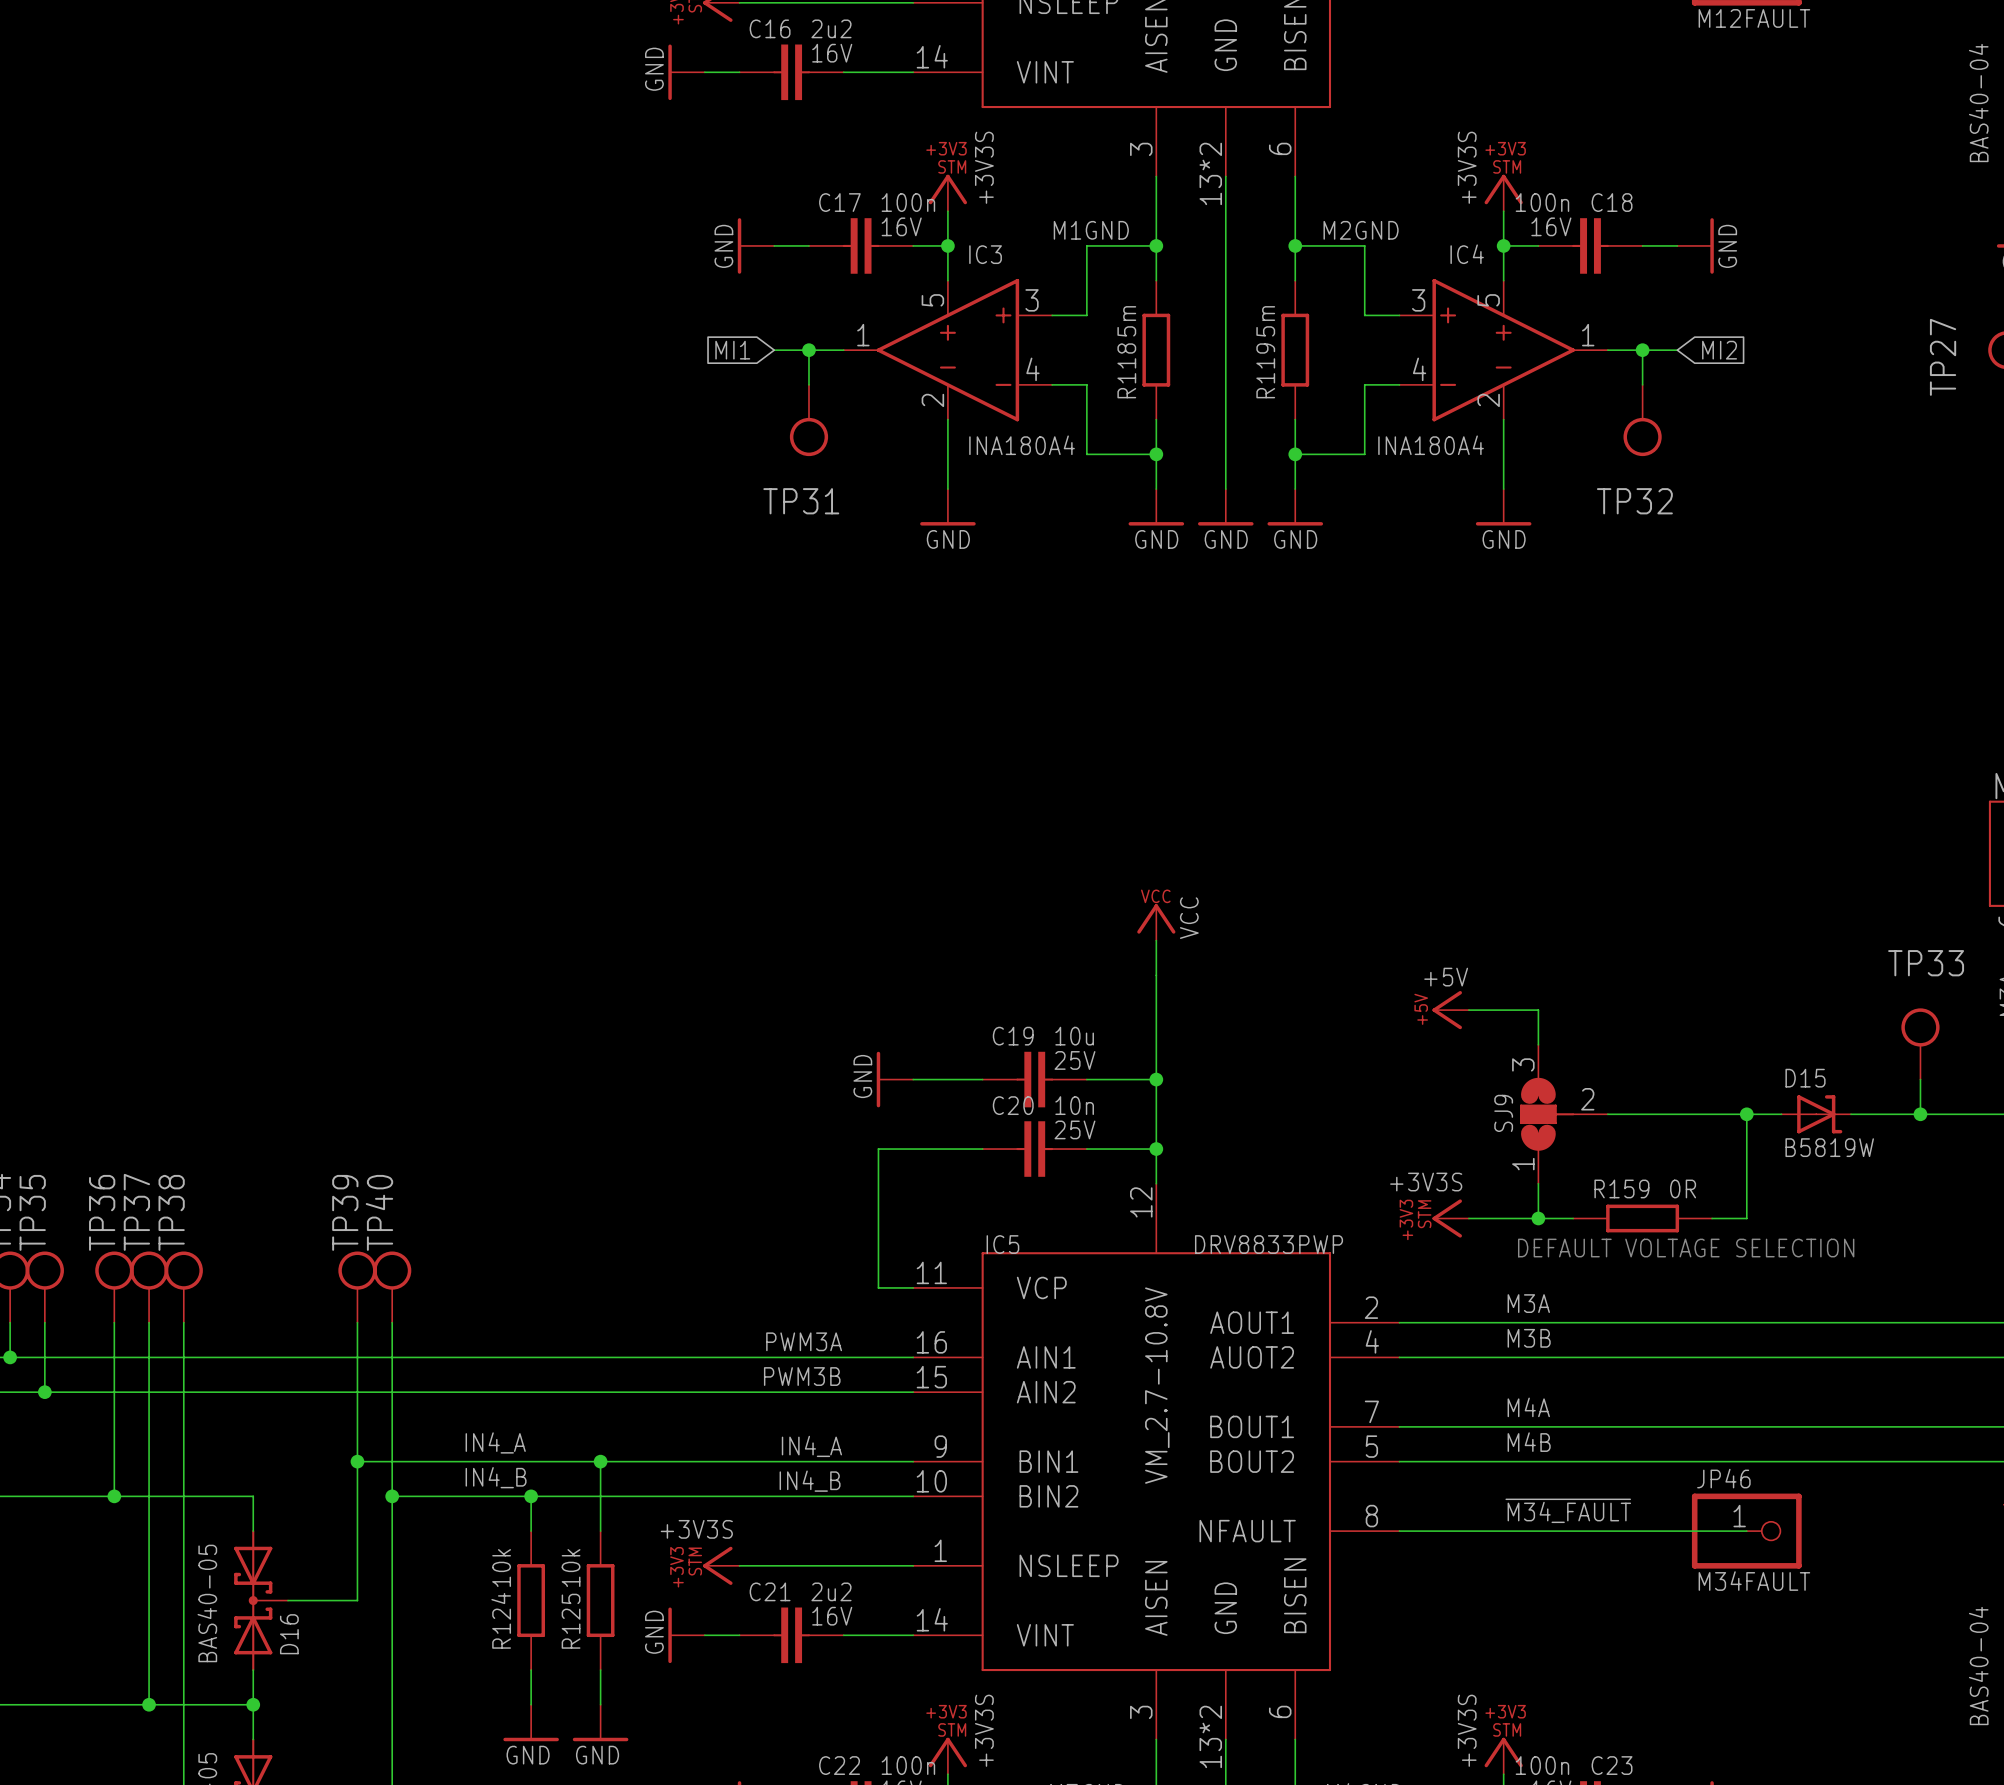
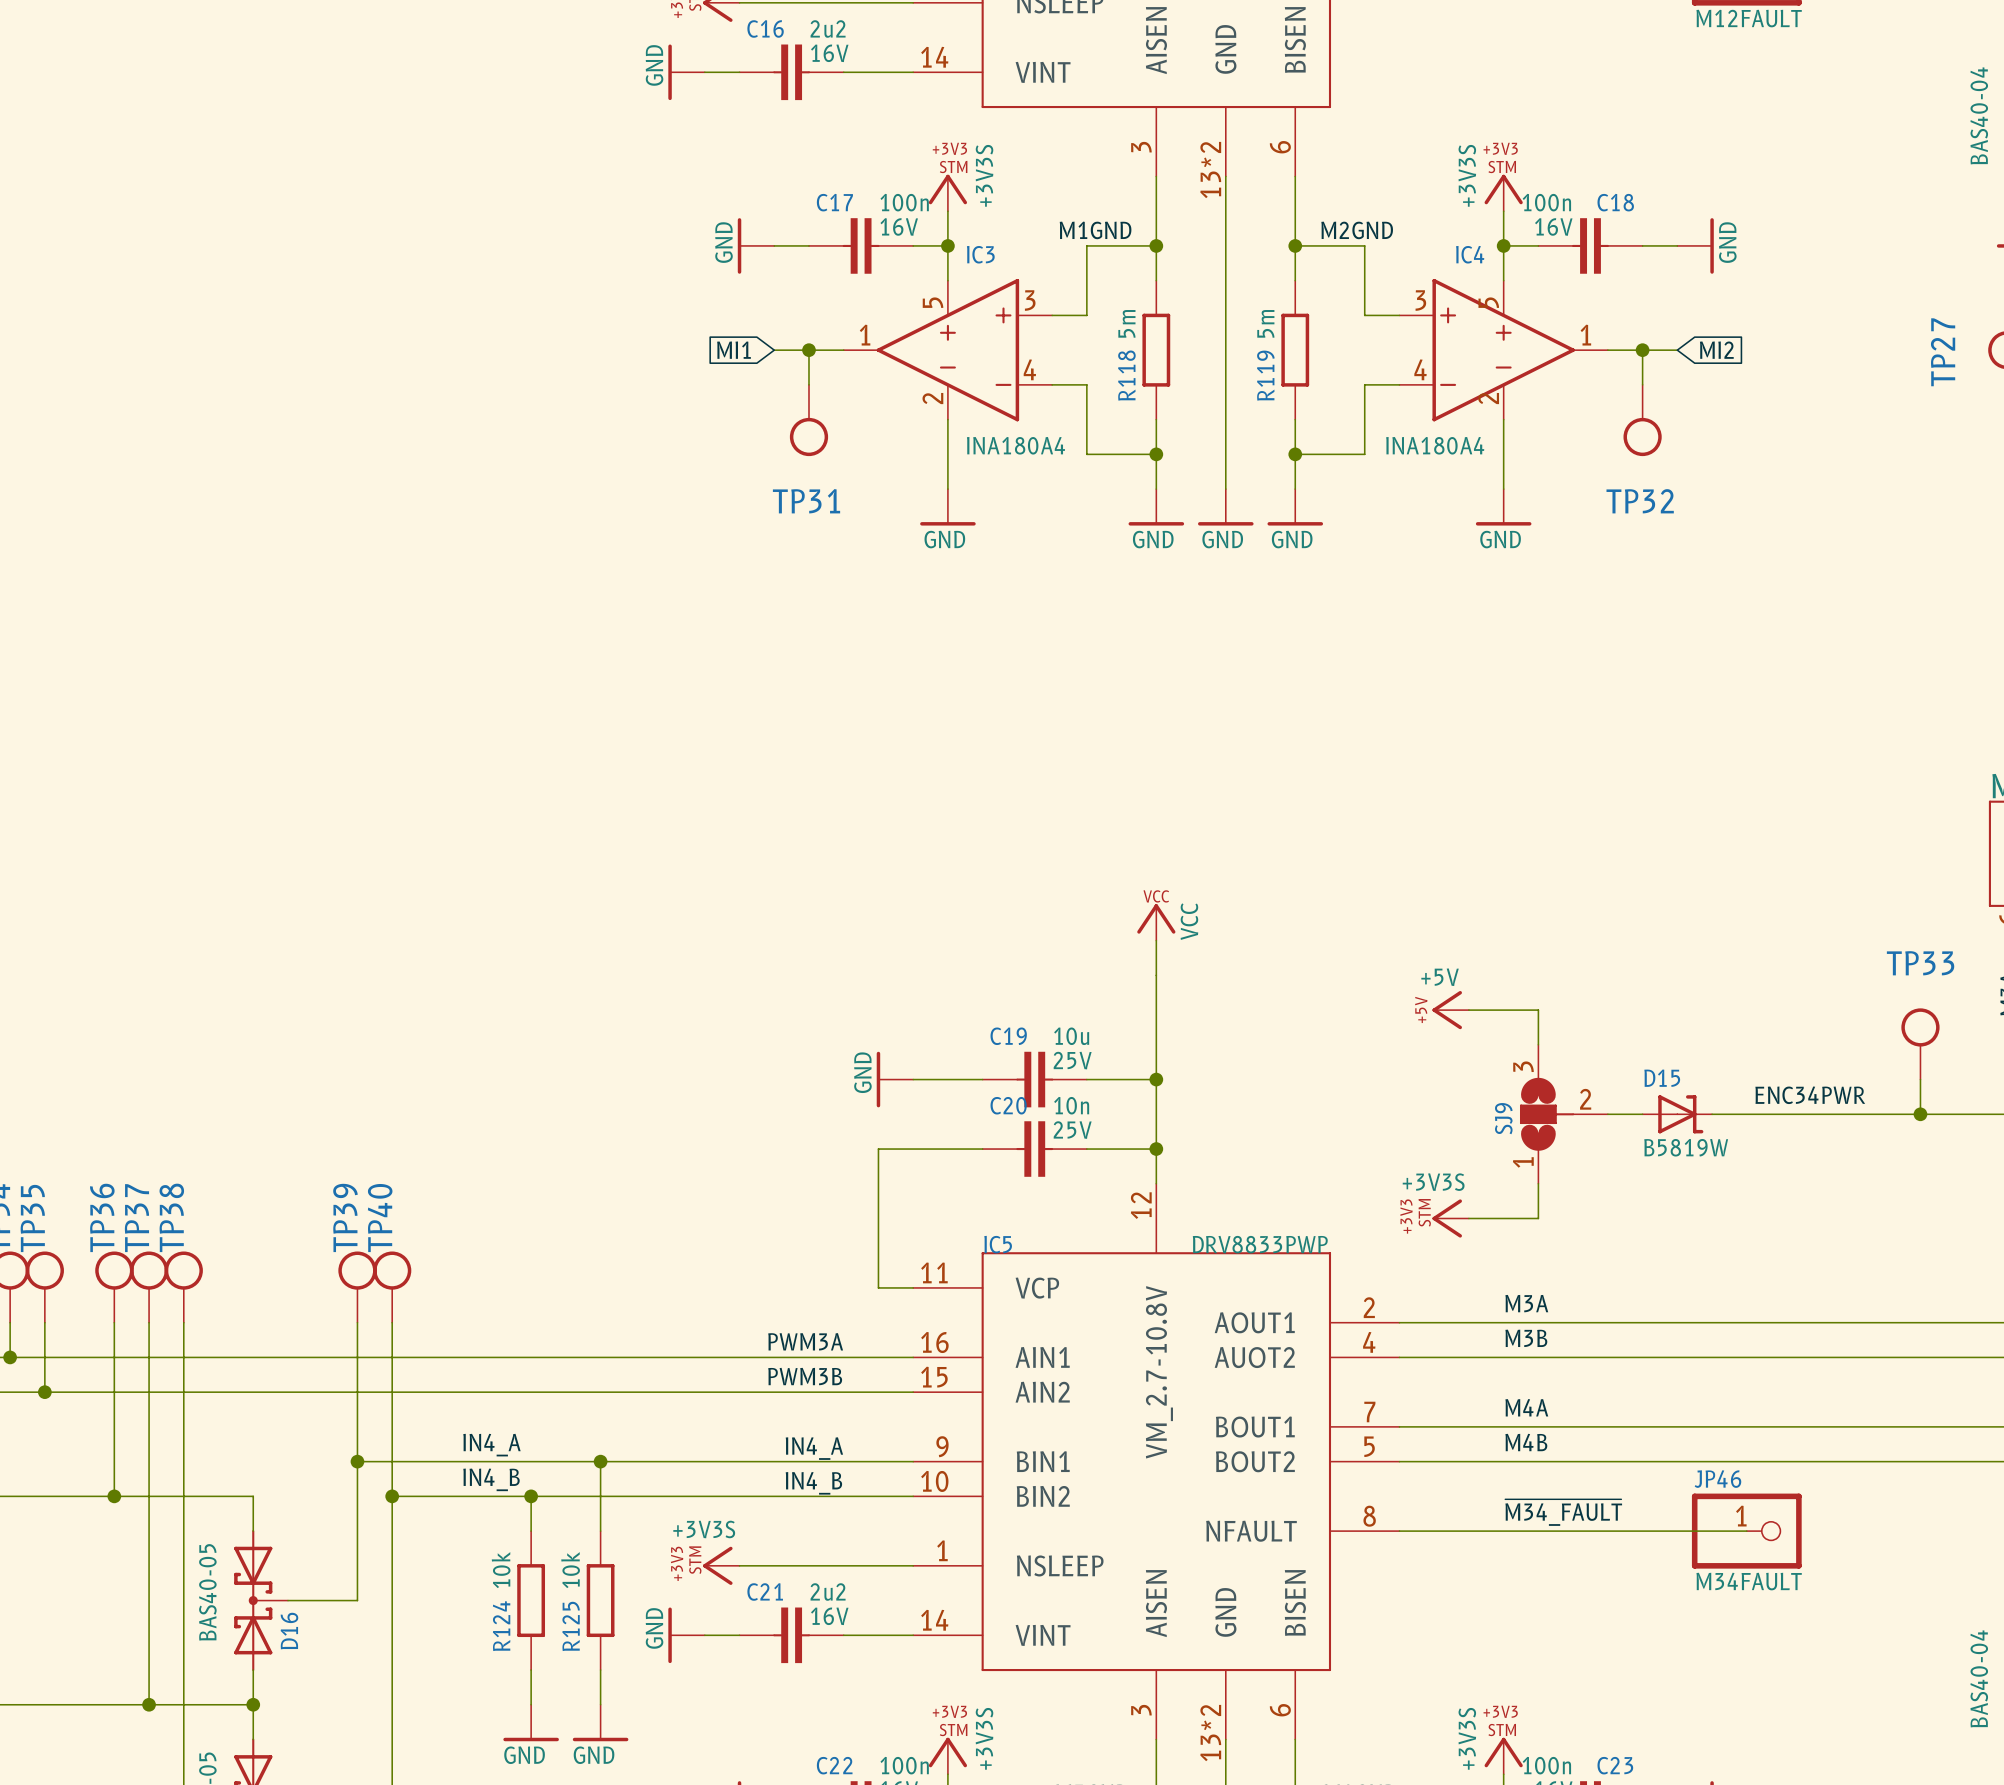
label: none -> ENC34PWR (1810, 1095)
wire: (1746, 1114) (1746, 1218) (1712, 1218) -> none
junction: (1746, 1114) -> none
D15 position: (1816, 1114) -> (1677, 1114)
wire: (1538, 1218) (1573, 1218) -> none
junction: (1538, 1218) -> none
R159: 0R (1642, 1218) -> none
text: DEFAULT VOLTAGE SELECTION (1686, 1248) -> none

